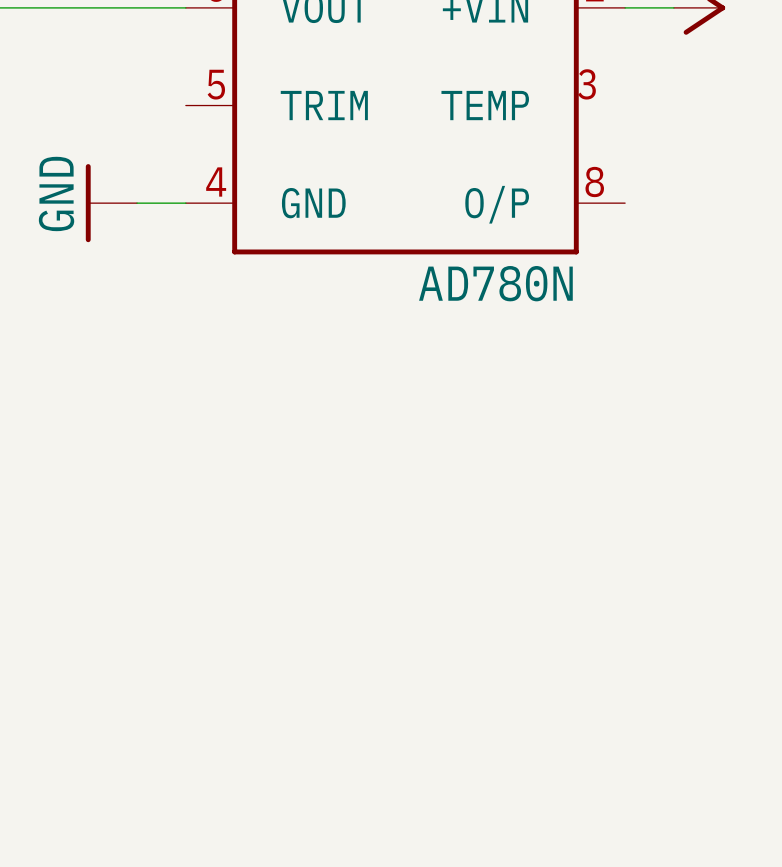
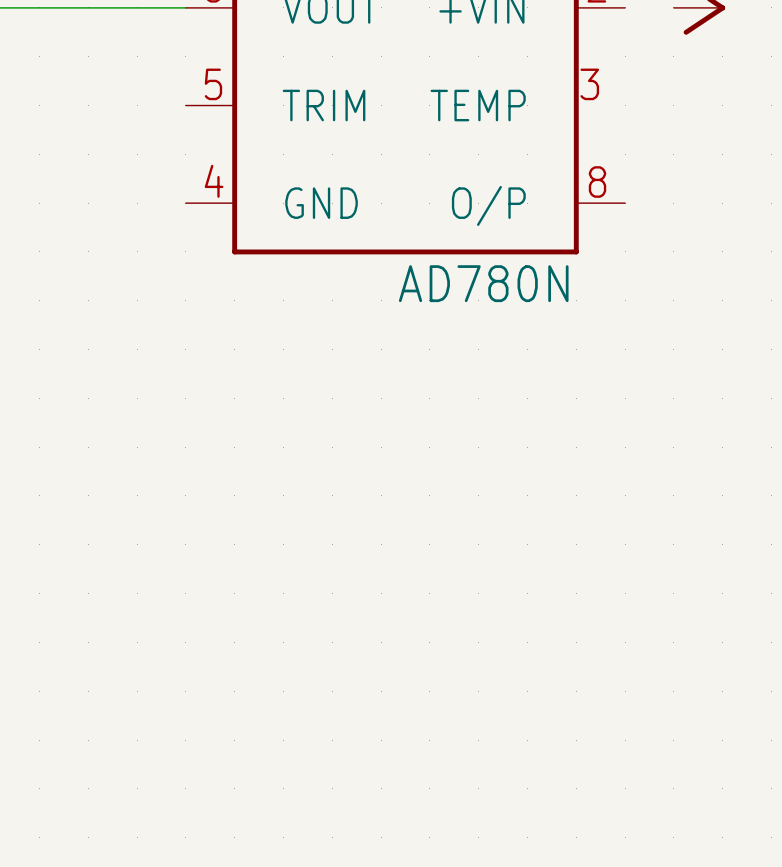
wire: (625, 7) (673, 7) -> none
power symbol: GND (111, 203) -> none
wire: (137, 203) (185, 203) -> none

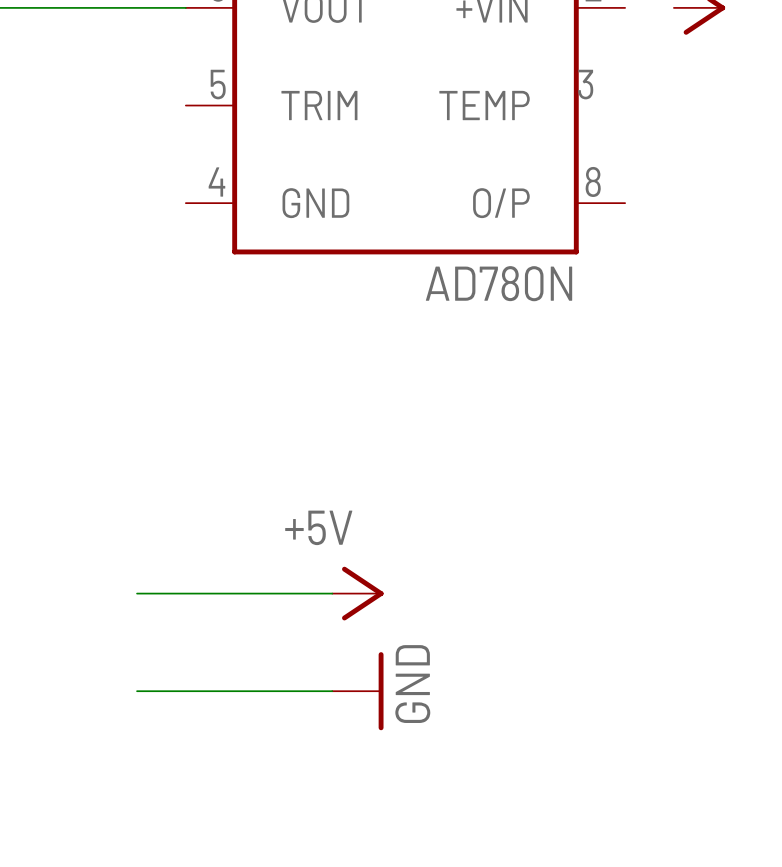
wire: none -> (137, 593) (332, 593)
power symbol: none -> +5V (357, 593)
wire: none -> (137, 691) (332, 691)
power symbol: none -> GND (357, 691)

